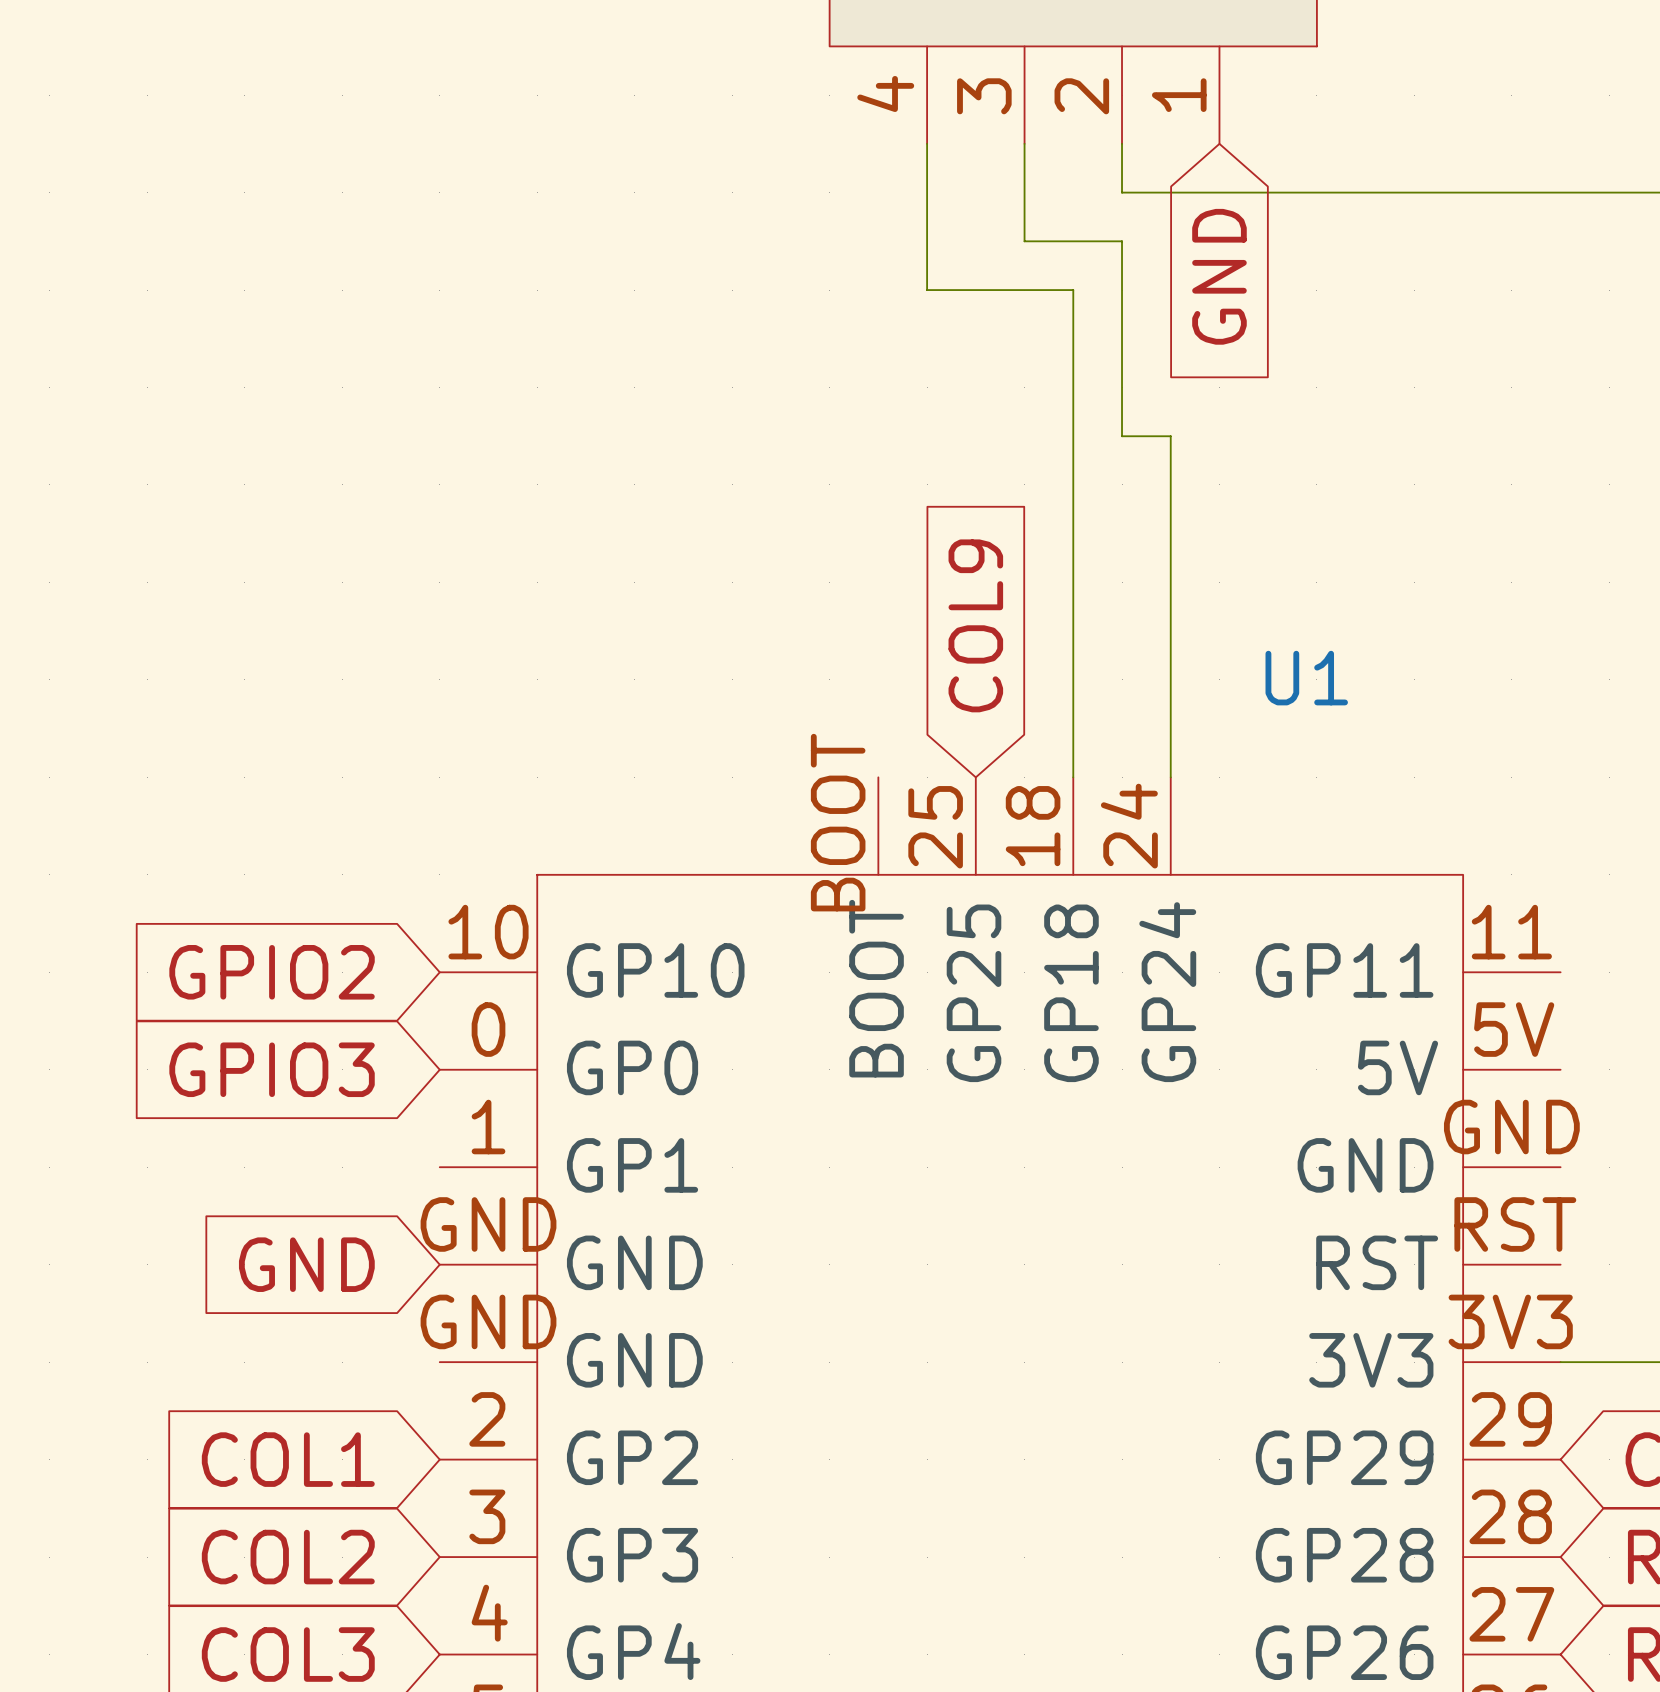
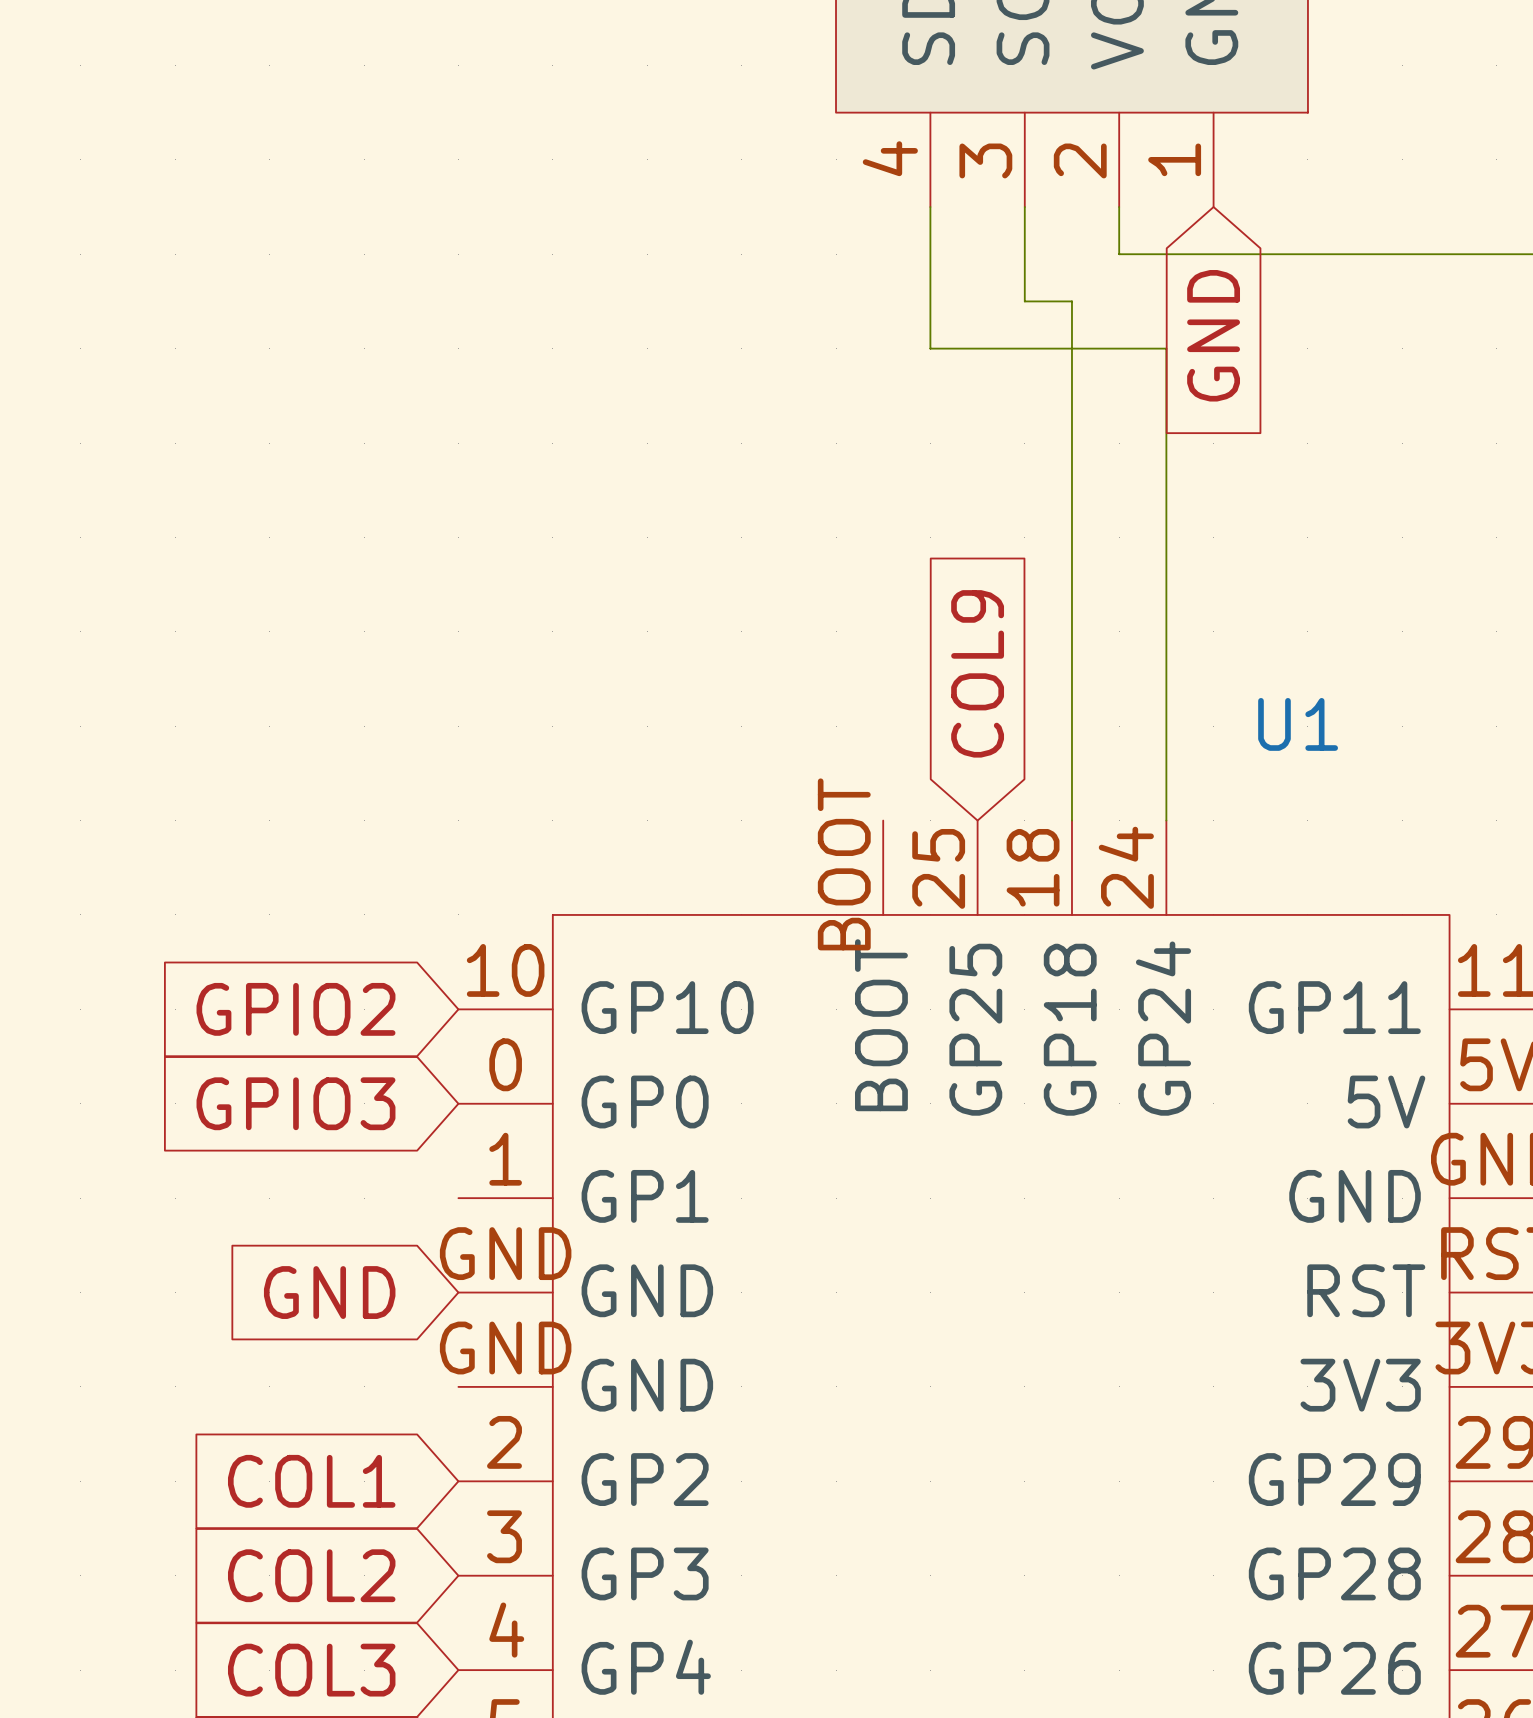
wire: (1073, 241) (1122, 241) (1122, 436) (1170, 436) -> (1071, 301) (1071, 348) (1166, 348) (1166, 490)

